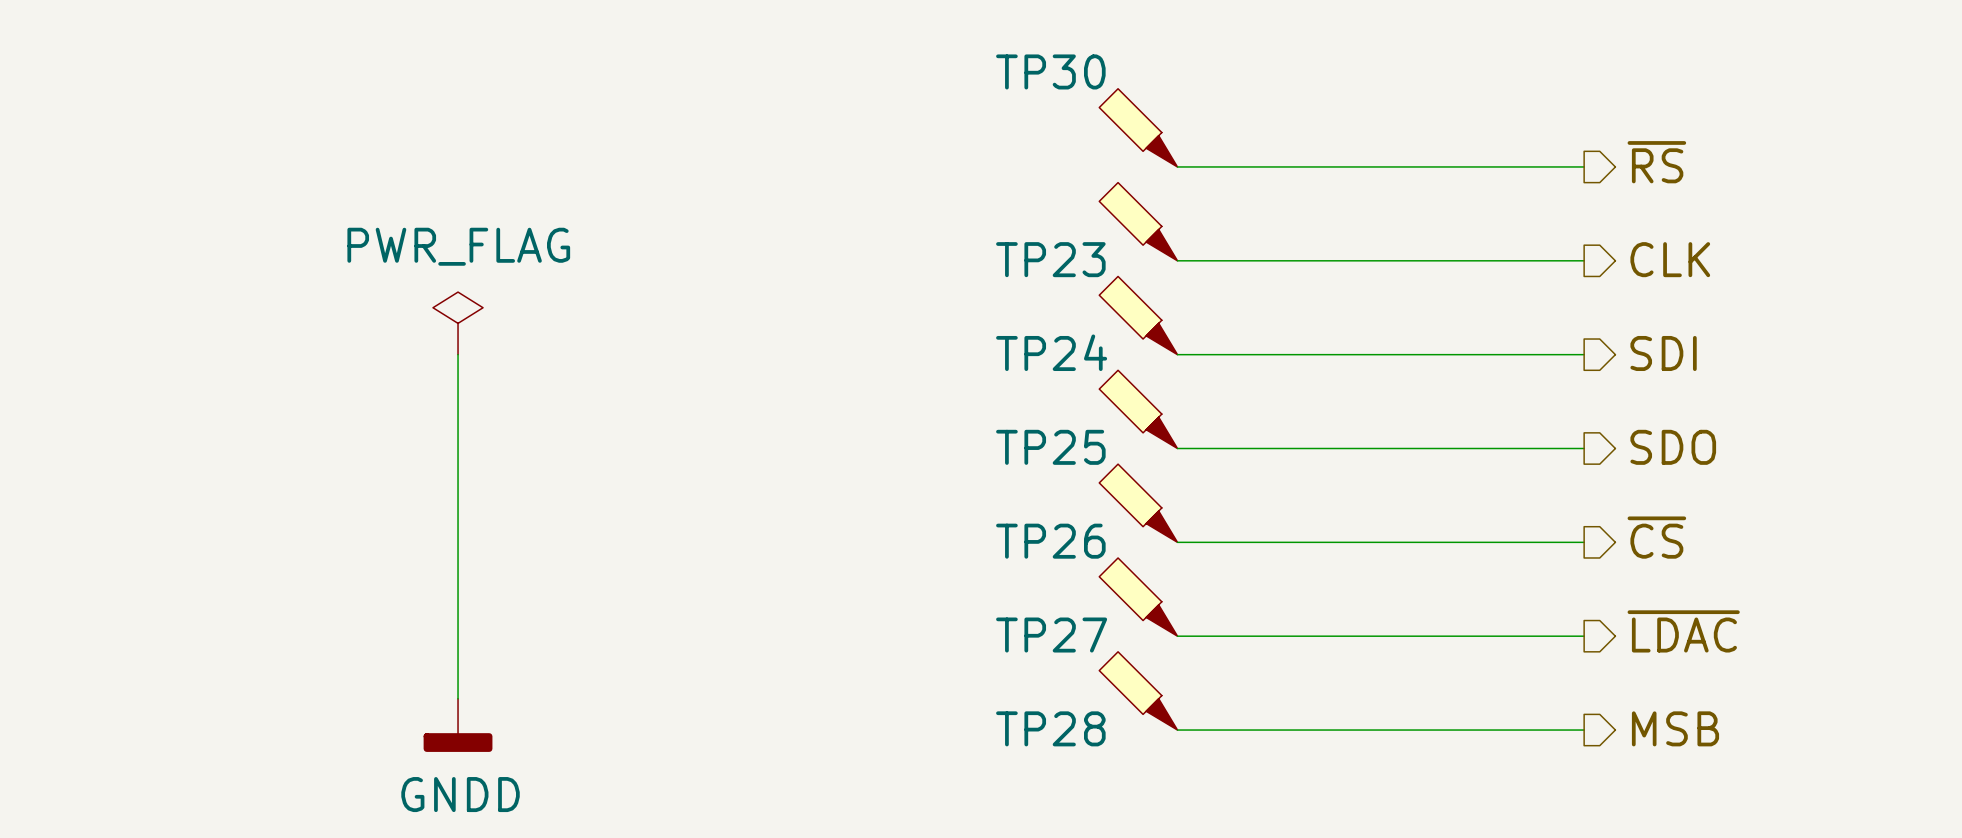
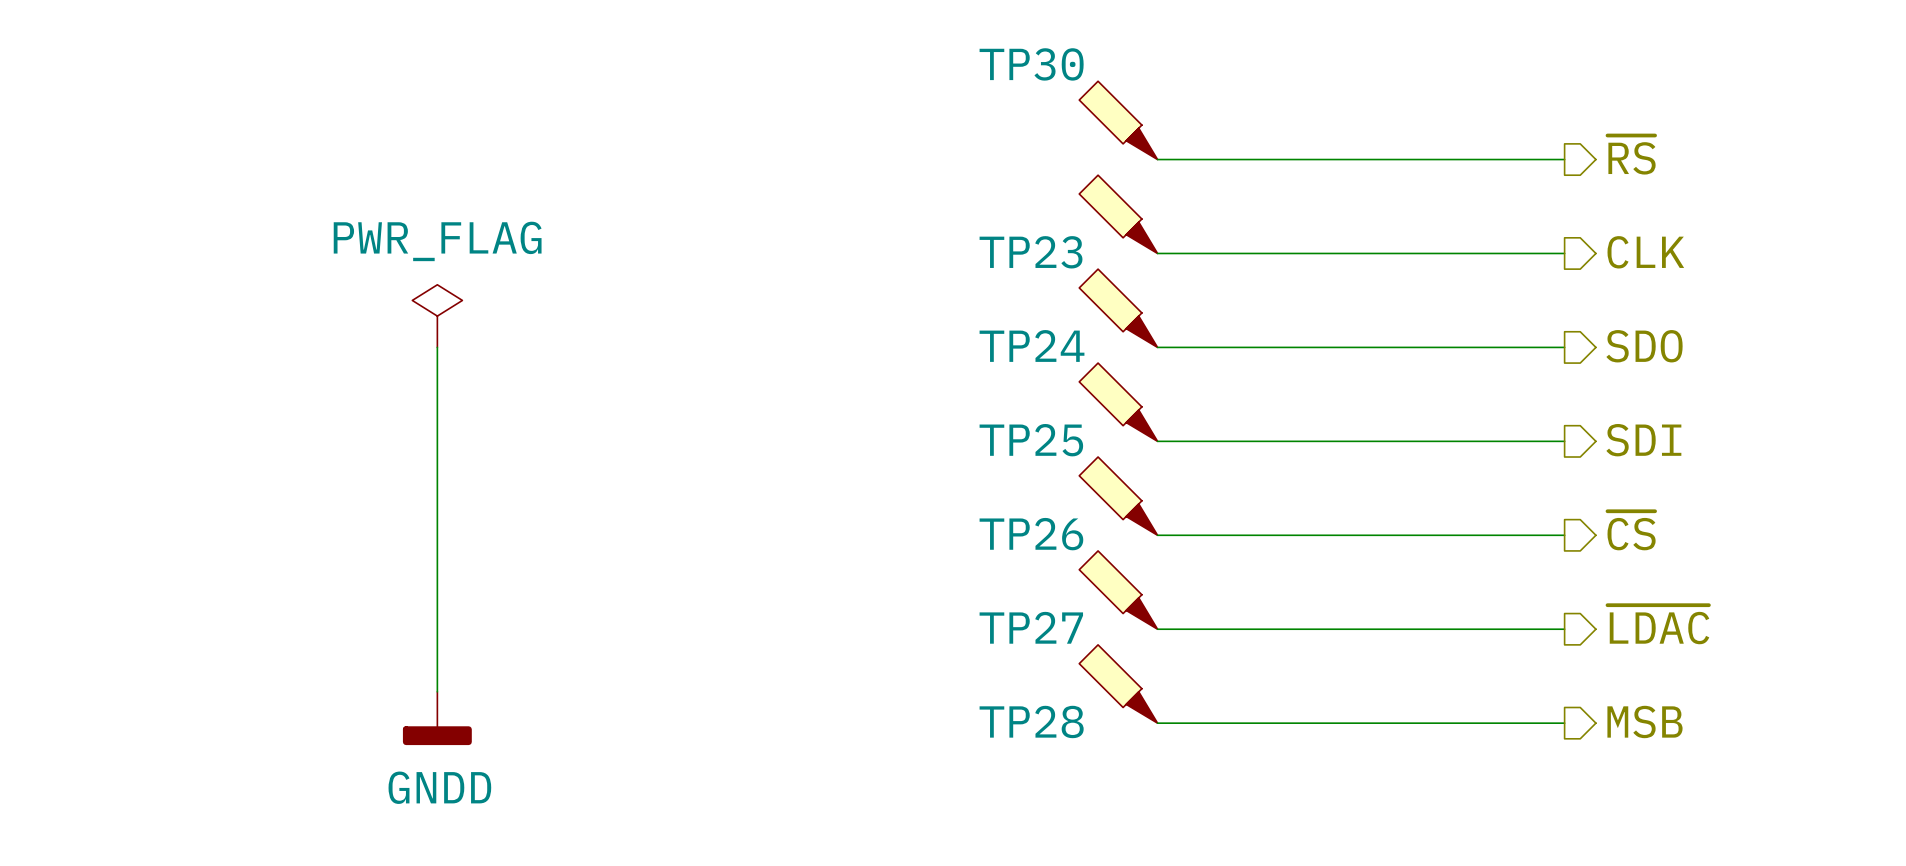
hierarchical label: SDI (1663, 353) -> SDO (1644, 346)
hierarchical label: SDO (1673, 447) -> SDI (1643, 440)

